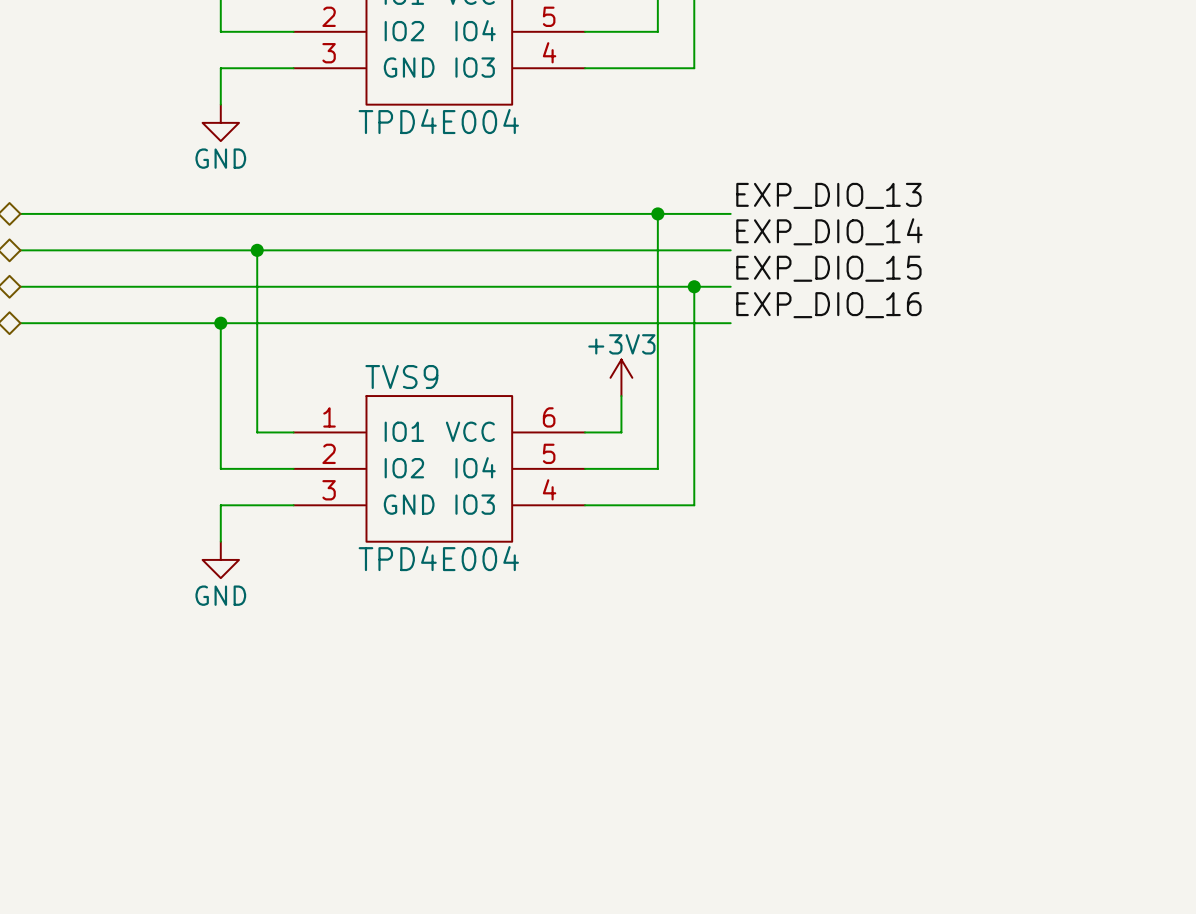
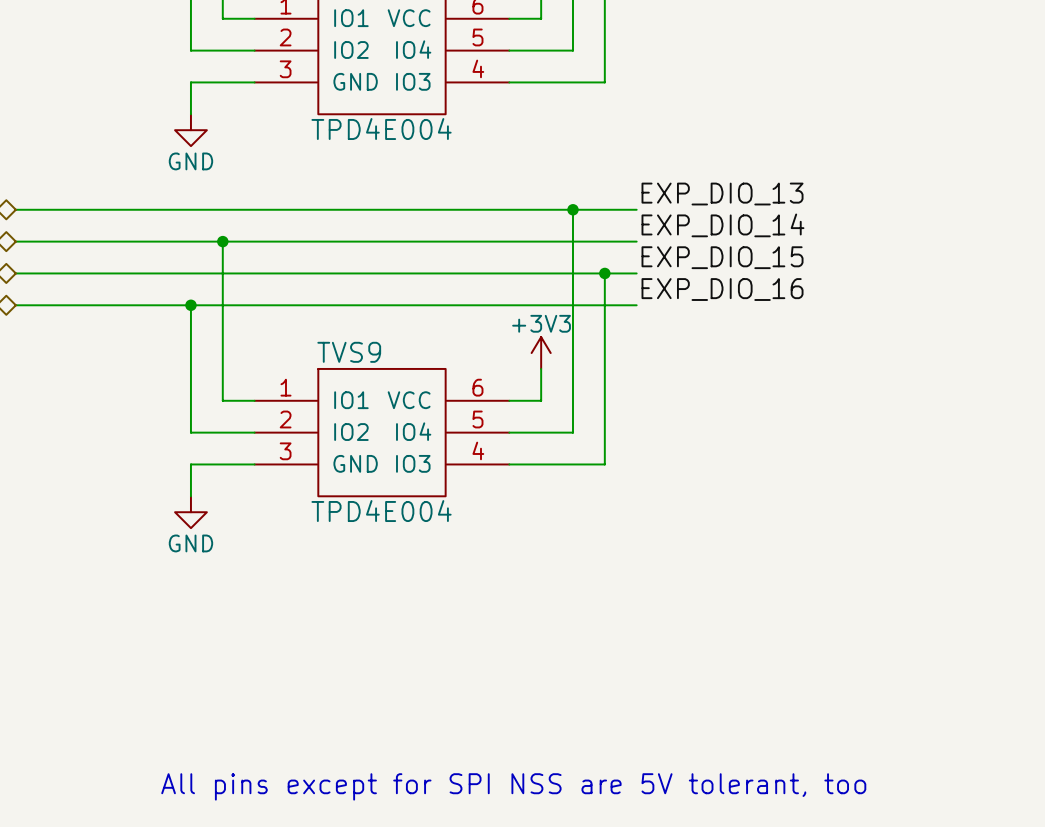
text: none -> All pins except for SPI NSS are 5V tolerant, too (513, 786)

